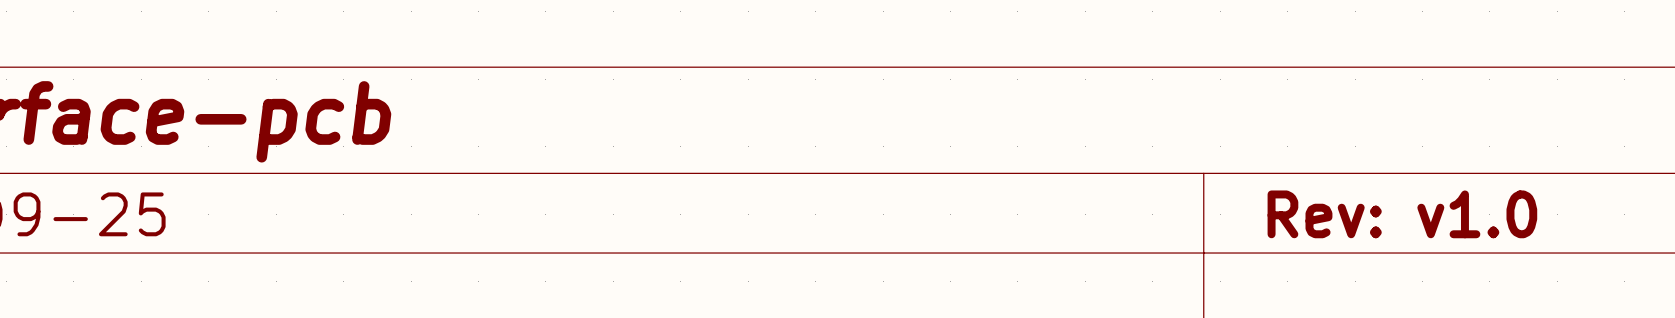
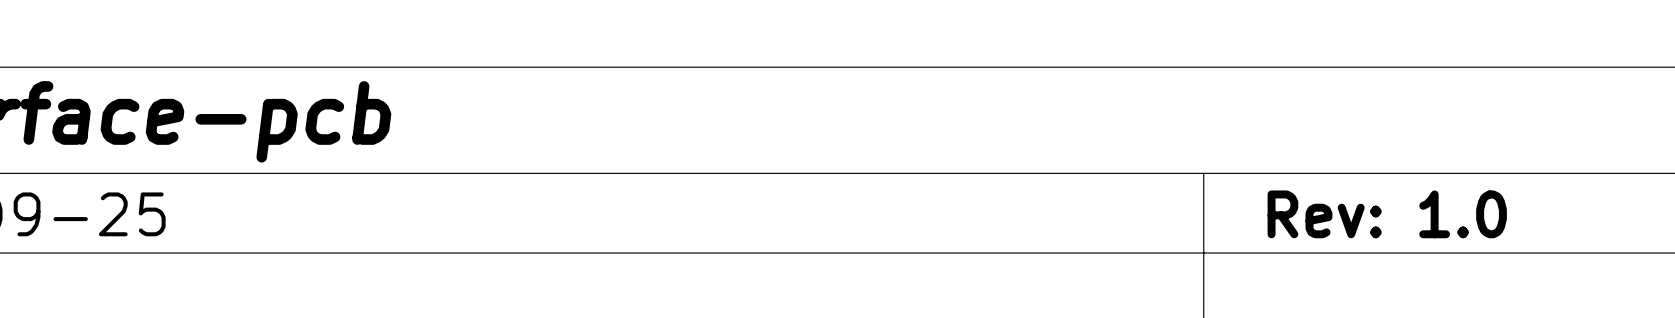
title block: Rev: v1.0 (1402, 214) -> Rev: 1.0 (1387, 214)

